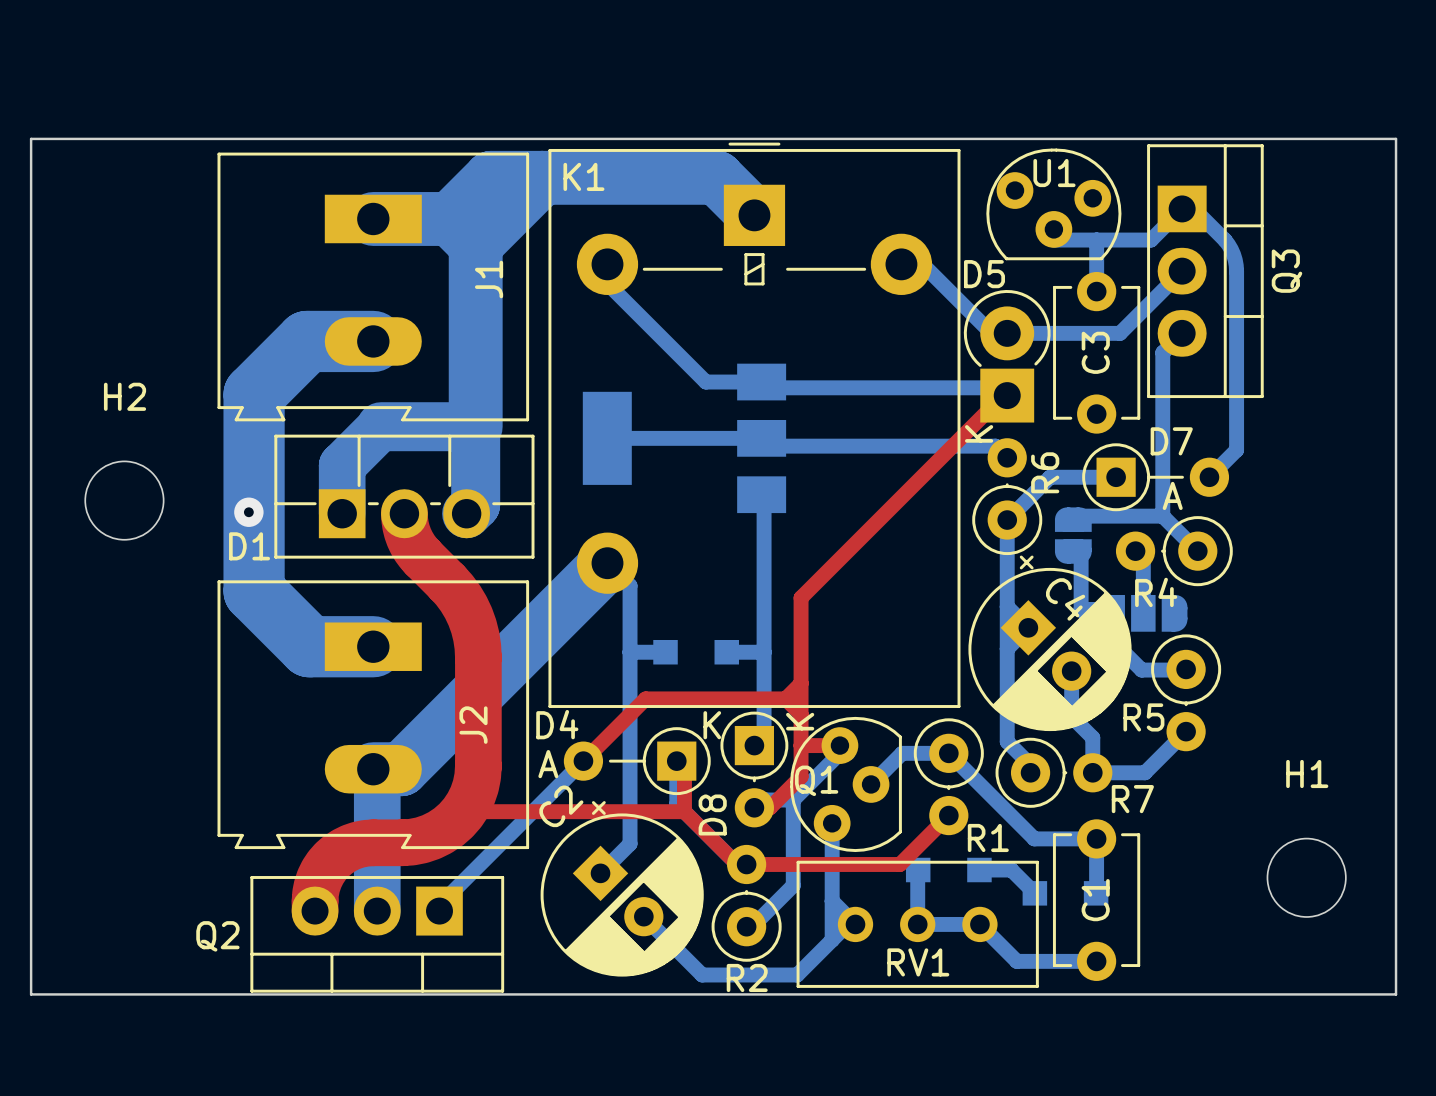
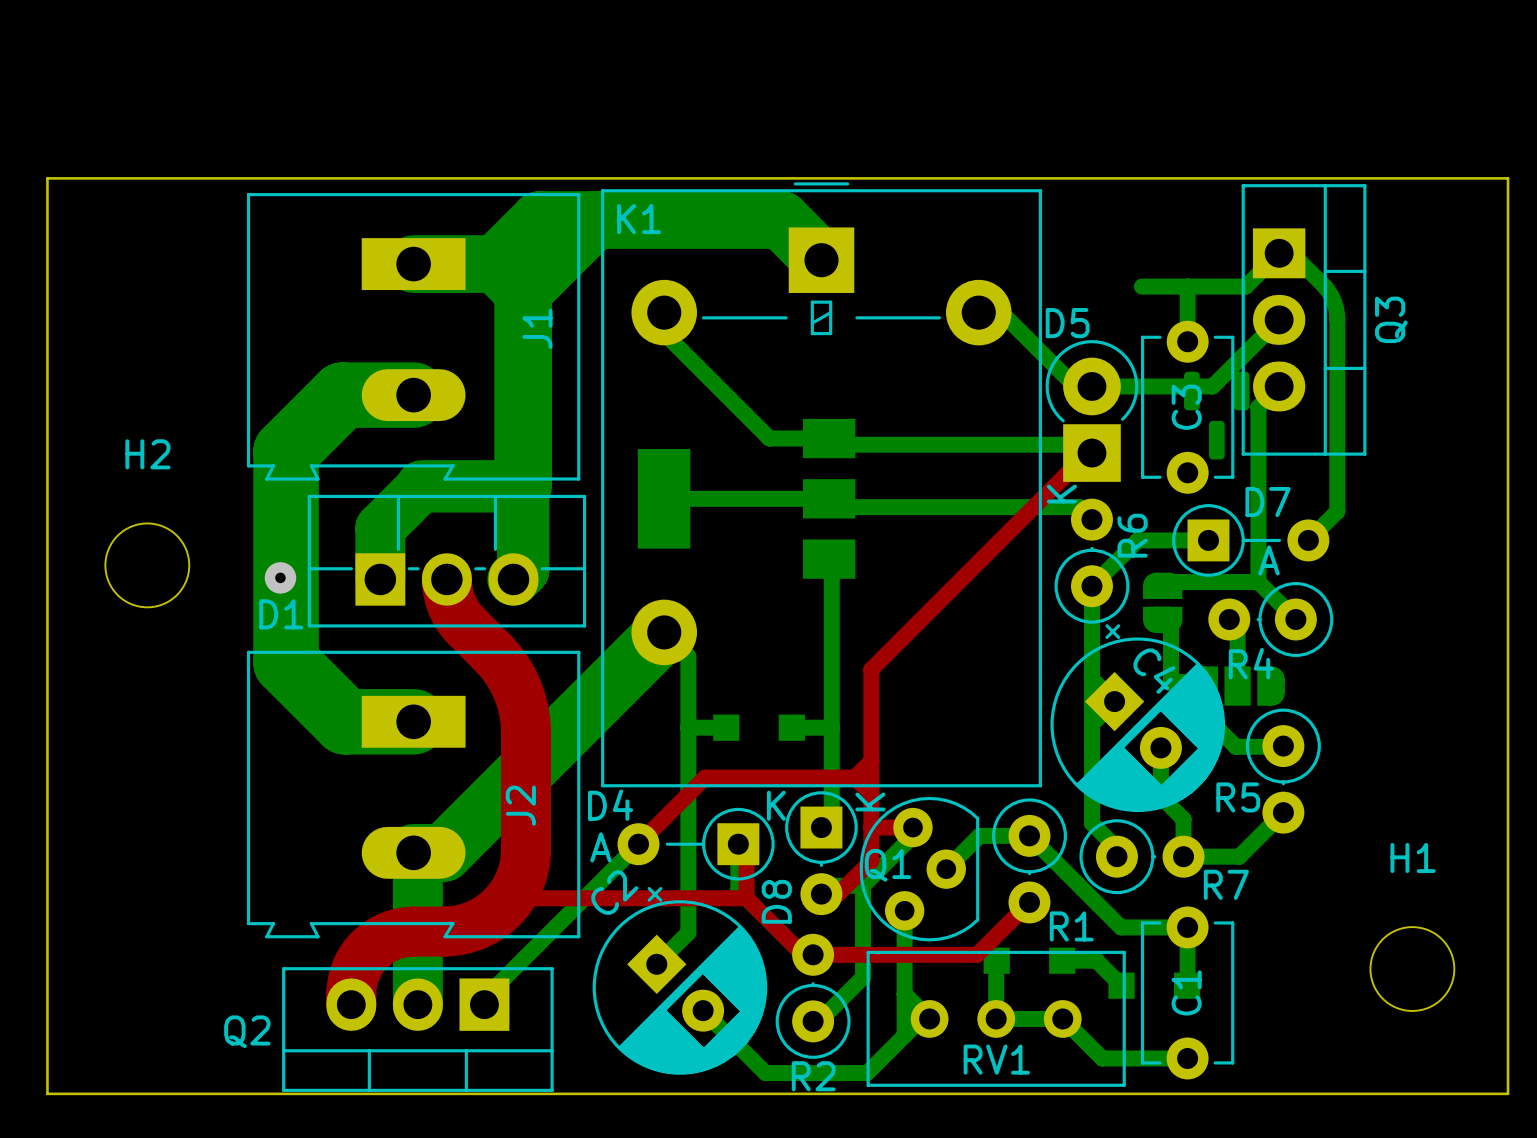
U1: (1053, 204) -> none
part: none -> (1216, 415)

